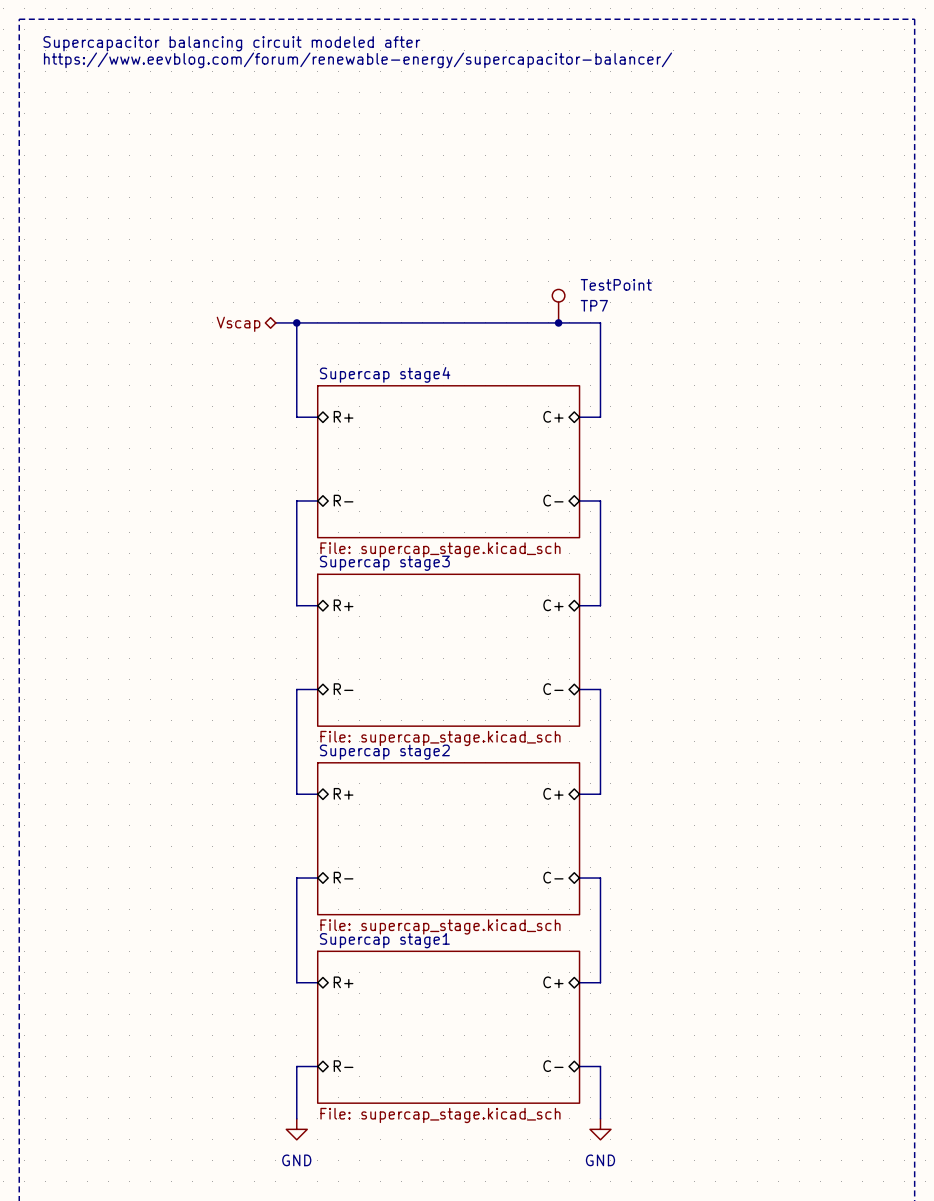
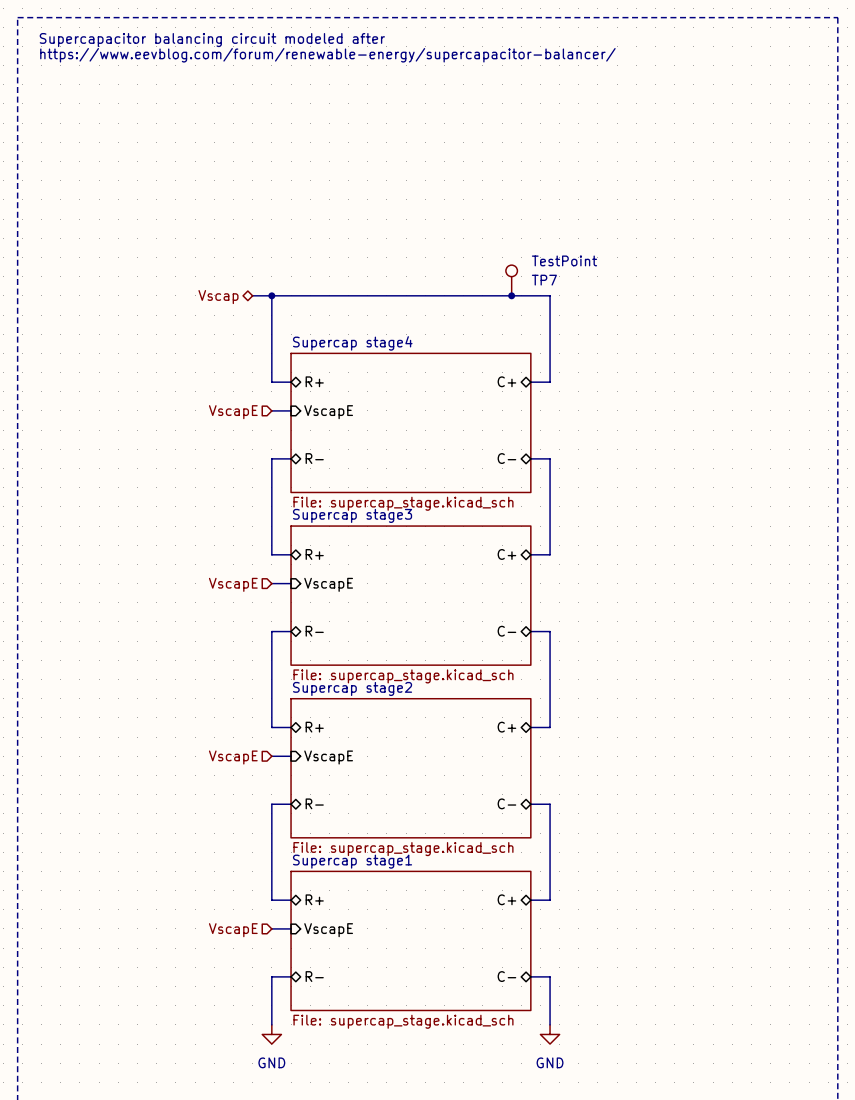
wire: none -> (271, 410) (291, 410)
hierarchical label: none -> VscapE (233, 412)
sheet pin: none -> VscapE (328, 412)
wire: none -> (271, 583) (291, 583)
hierarchical label: none -> VscapE (233, 584)
sheet pin: none -> VscapE (328, 584)
wire: none -> (271, 756) (291, 756)
hierarchical label: none -> VscapE (233, 757)
sheet pin: none -> VscapE (328, 757)
wire: none -> (271, 928) (291, 928)
hierarchical label: none -> VscapE (233, 930)
sheet pin: none -> VscapE (328, 930)

